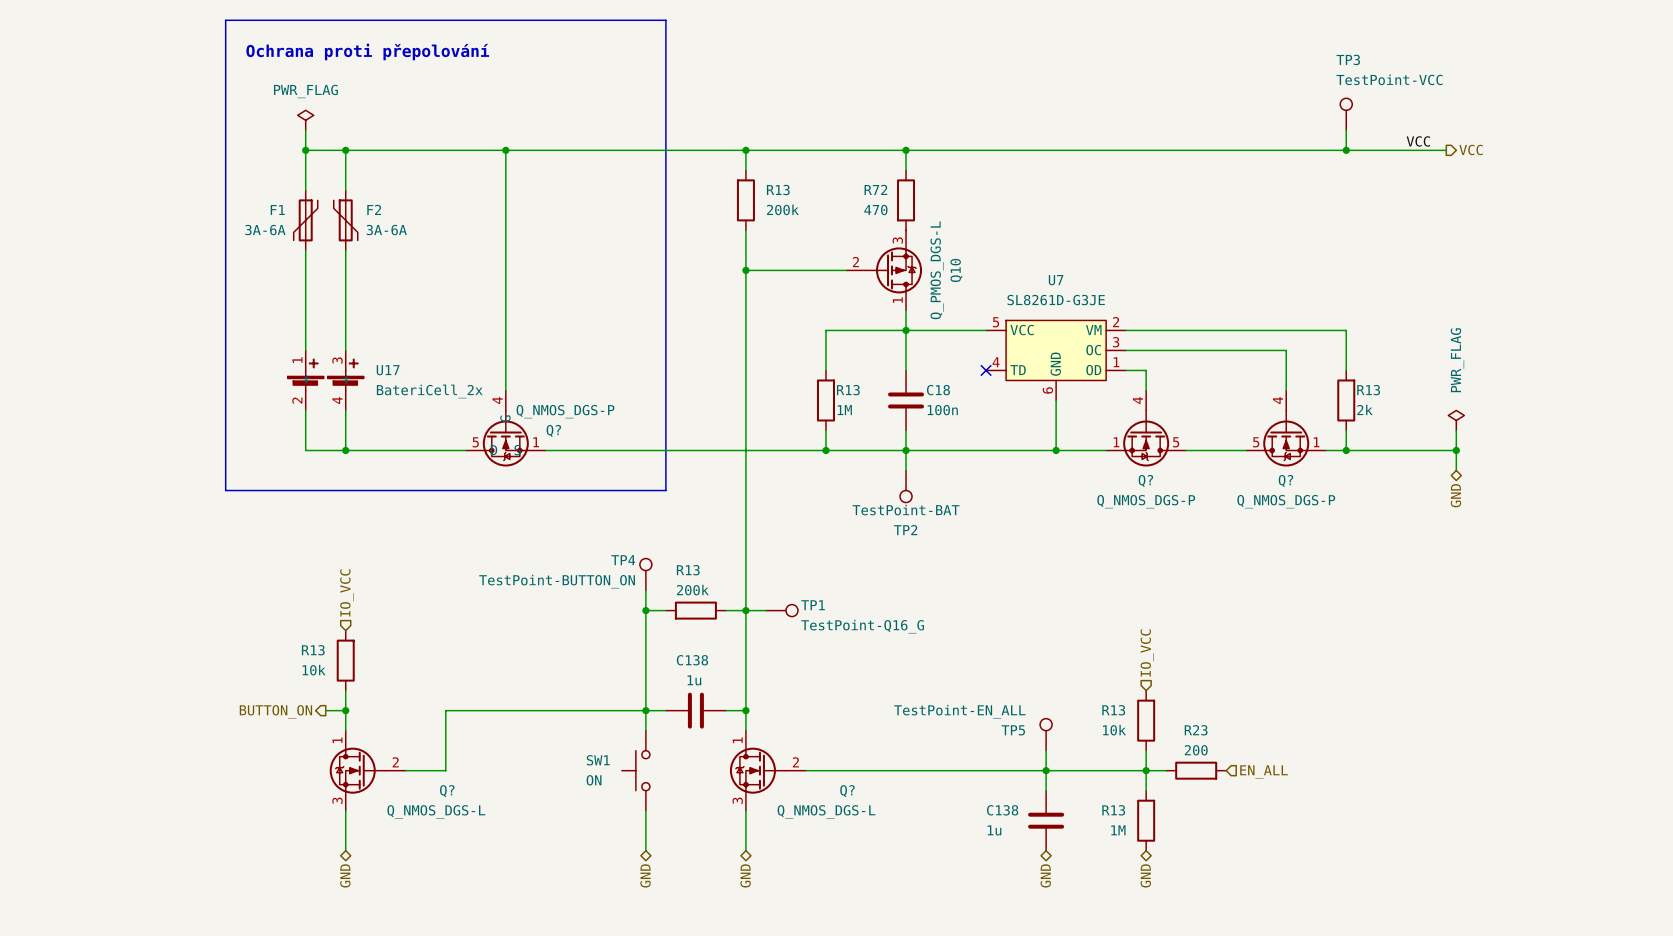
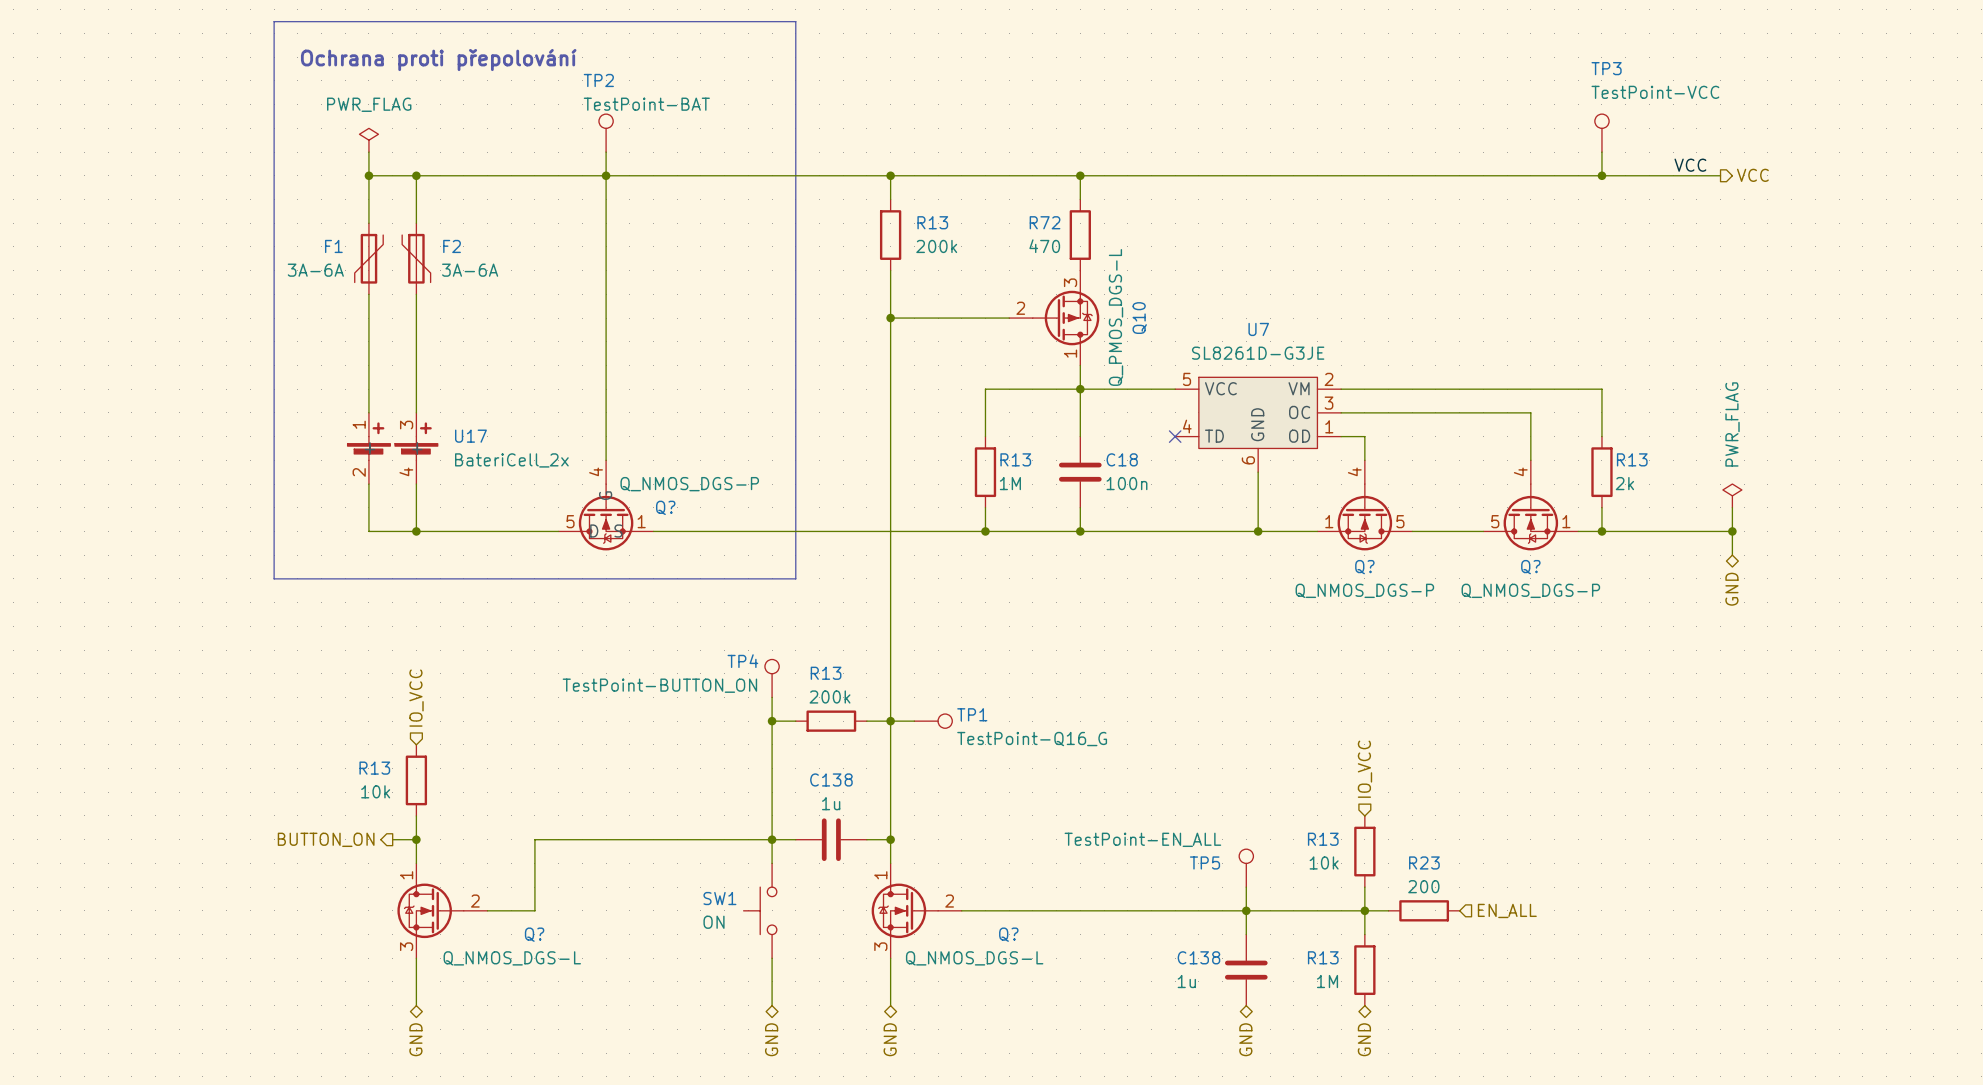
wire: none -> (606, 152) (606, 175)
wire: (906, 450) (906, 470) -> none
TP2 position: (906, 486) -> (606, 133)
TP2 rotation: 0° (906, 496) -> 180° (606, 121)
TP2 value position: TestPoint-BAT (906, 510) -> TestPoint-BAT (646, 104)

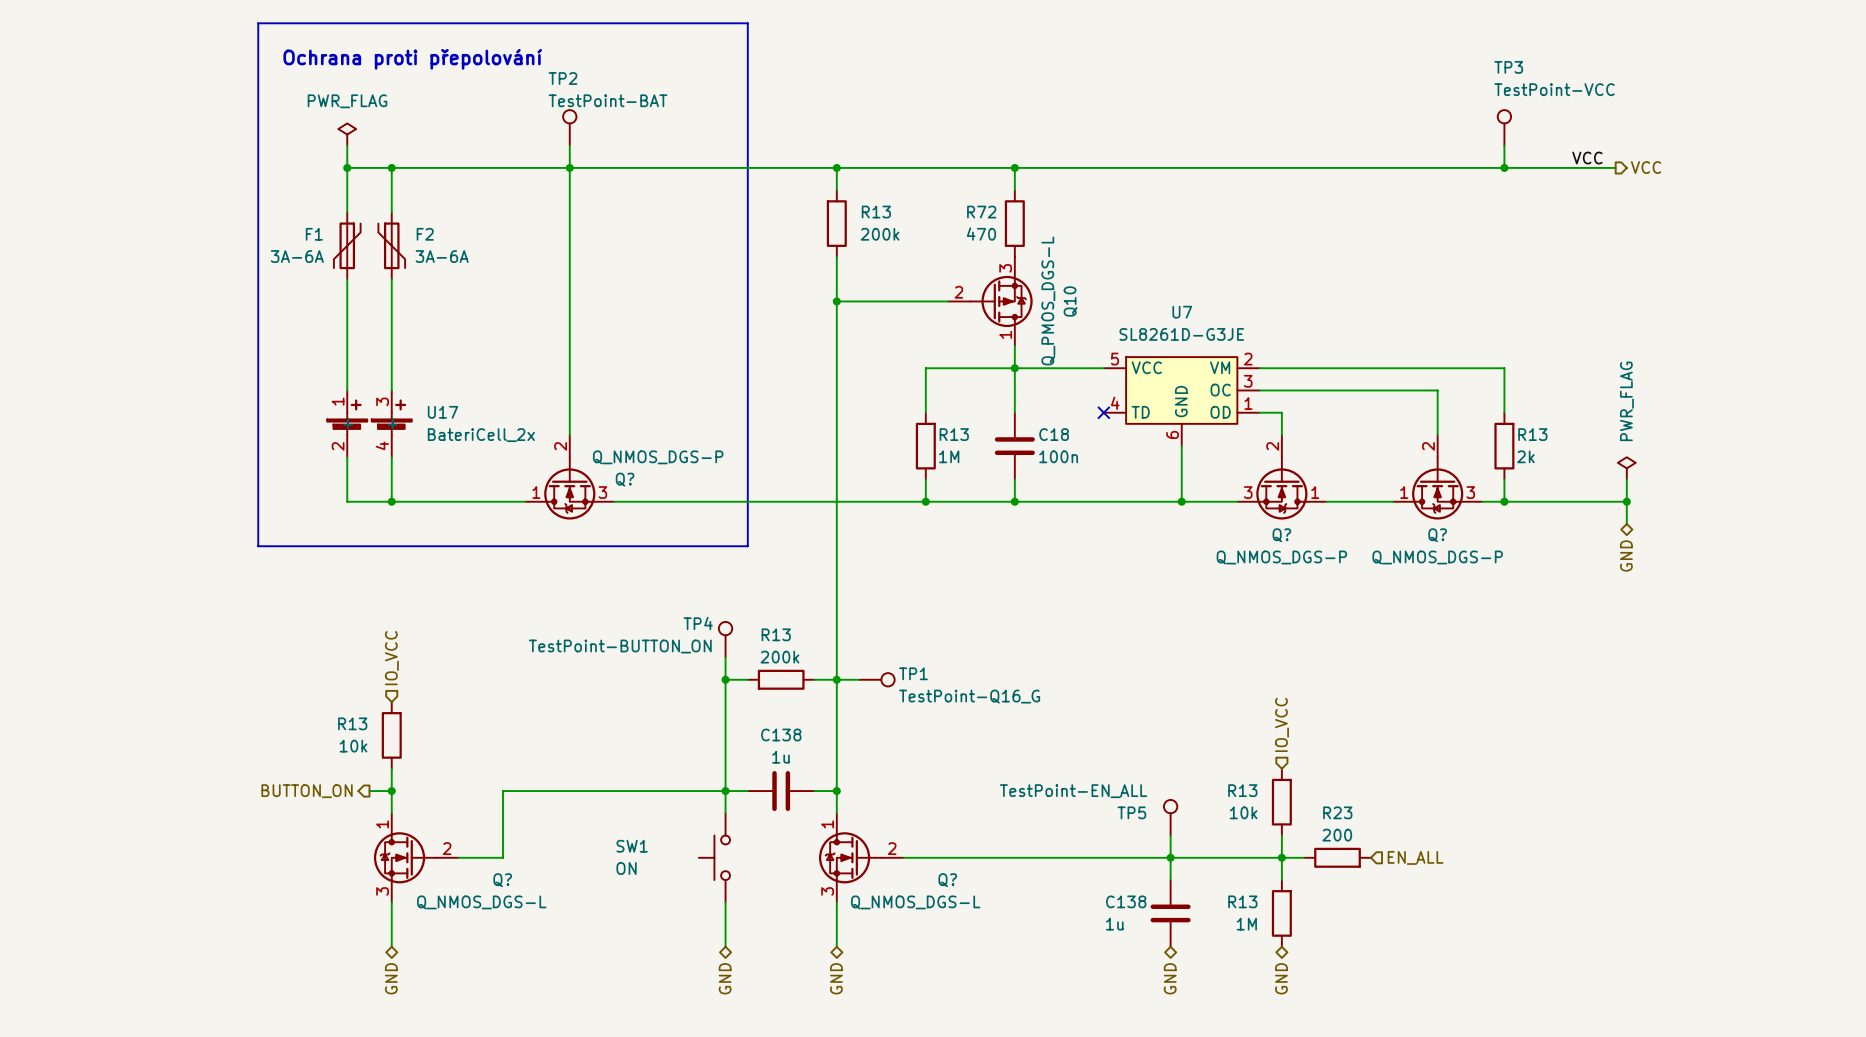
Q? symbol: [558, 460, 654, 551] -> [525, 434, 615, 520]
Q? symbol: [1317, 460, 1413, 551] -> [1237, 434, 1327, 520]
Q? symbol: [1483, 460, 1579, 551] -> [1393, 434, 1483, 520]
SW1 name position: SW1 (719, 898) -> SW1 (632, 846)
SW1 value position: ON (714, 922) -> ON (626, 868)

